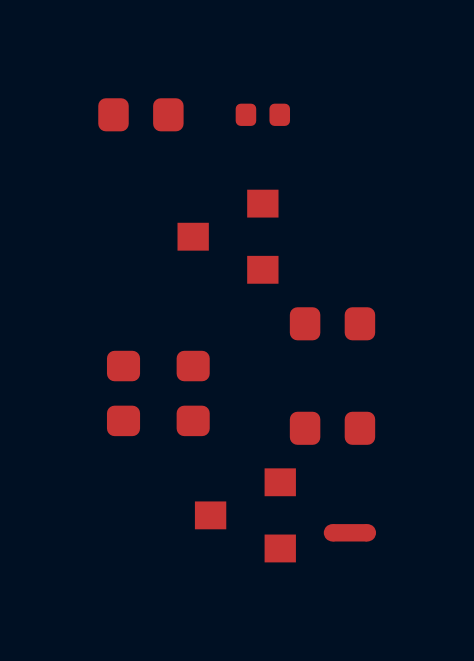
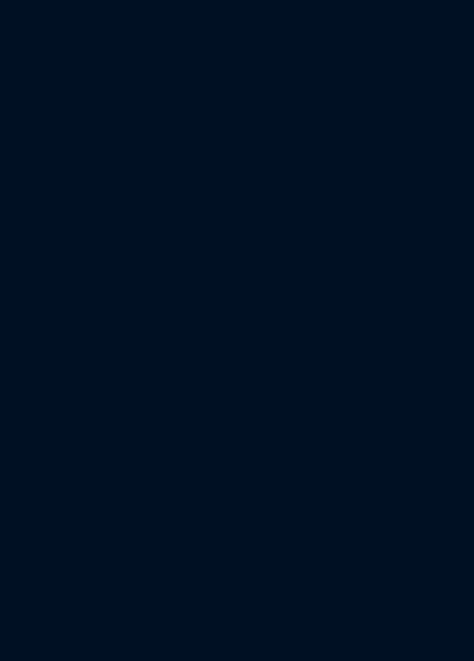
part: (140, 114) -> none
part: (262, 114) -> none
part: (228, 236) -> none
part: (332, 323) -> none
part: (123, 393) -> none
part: (193, 393) -> none
part: (332, 428) -> none
part: (245, 515) -> none
part: (349, 532) -> none

